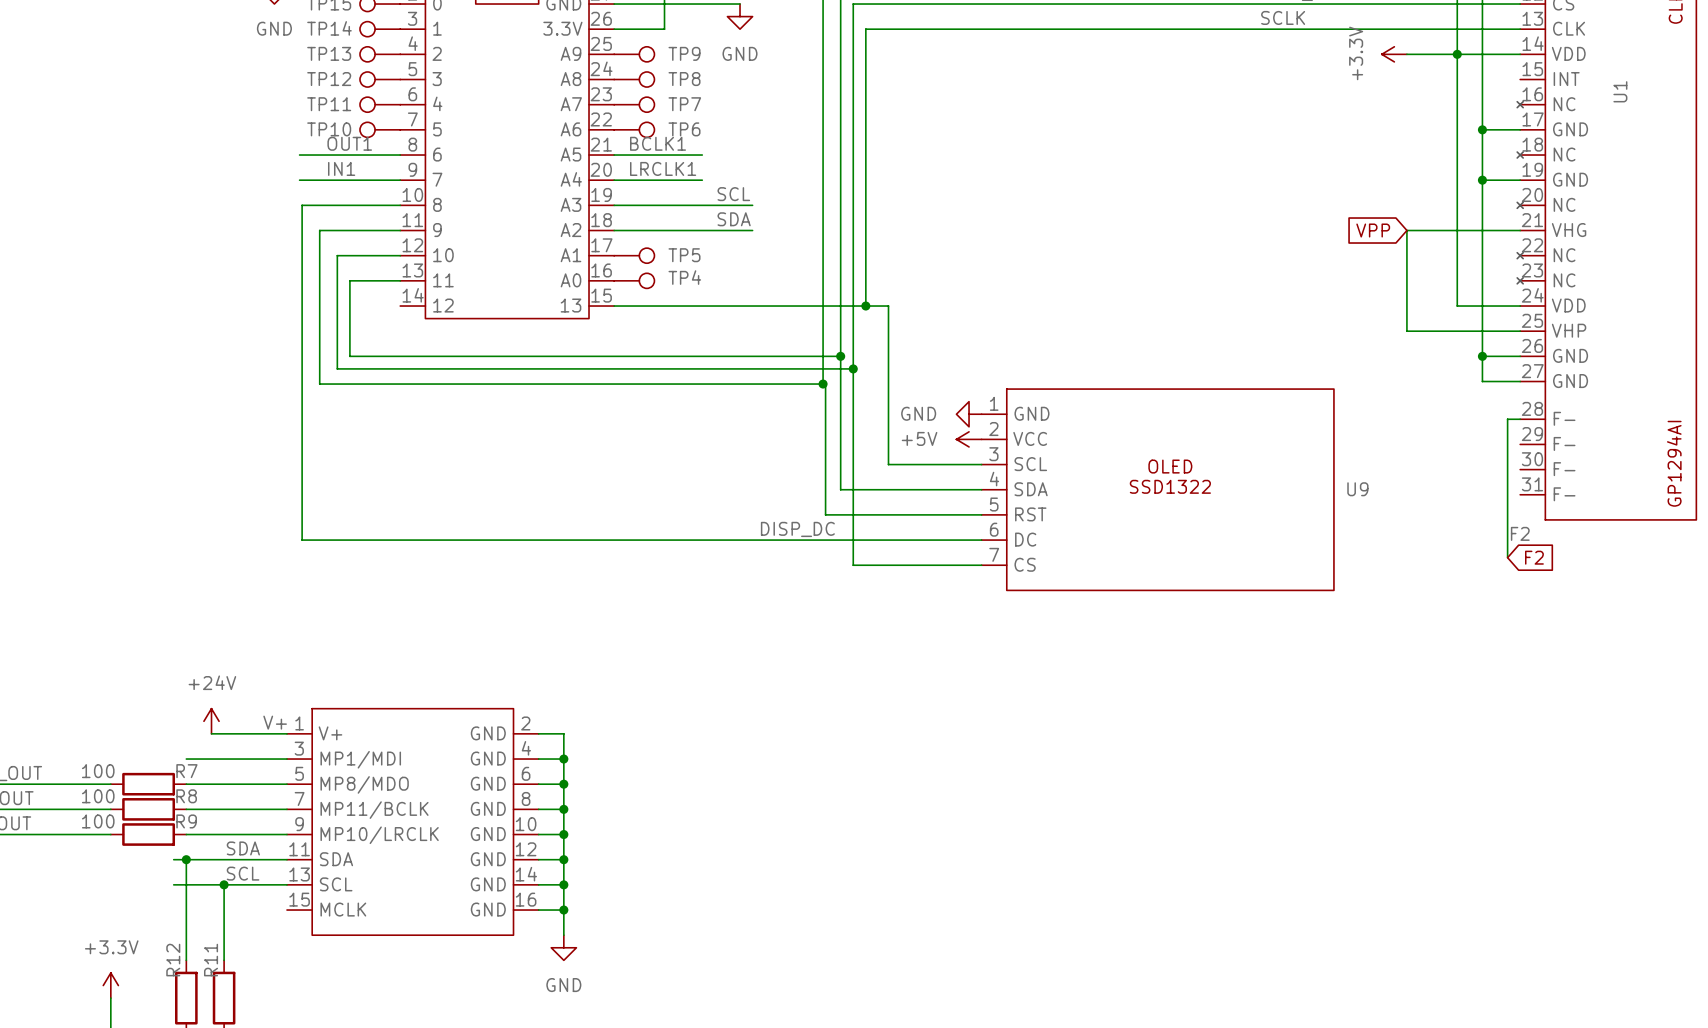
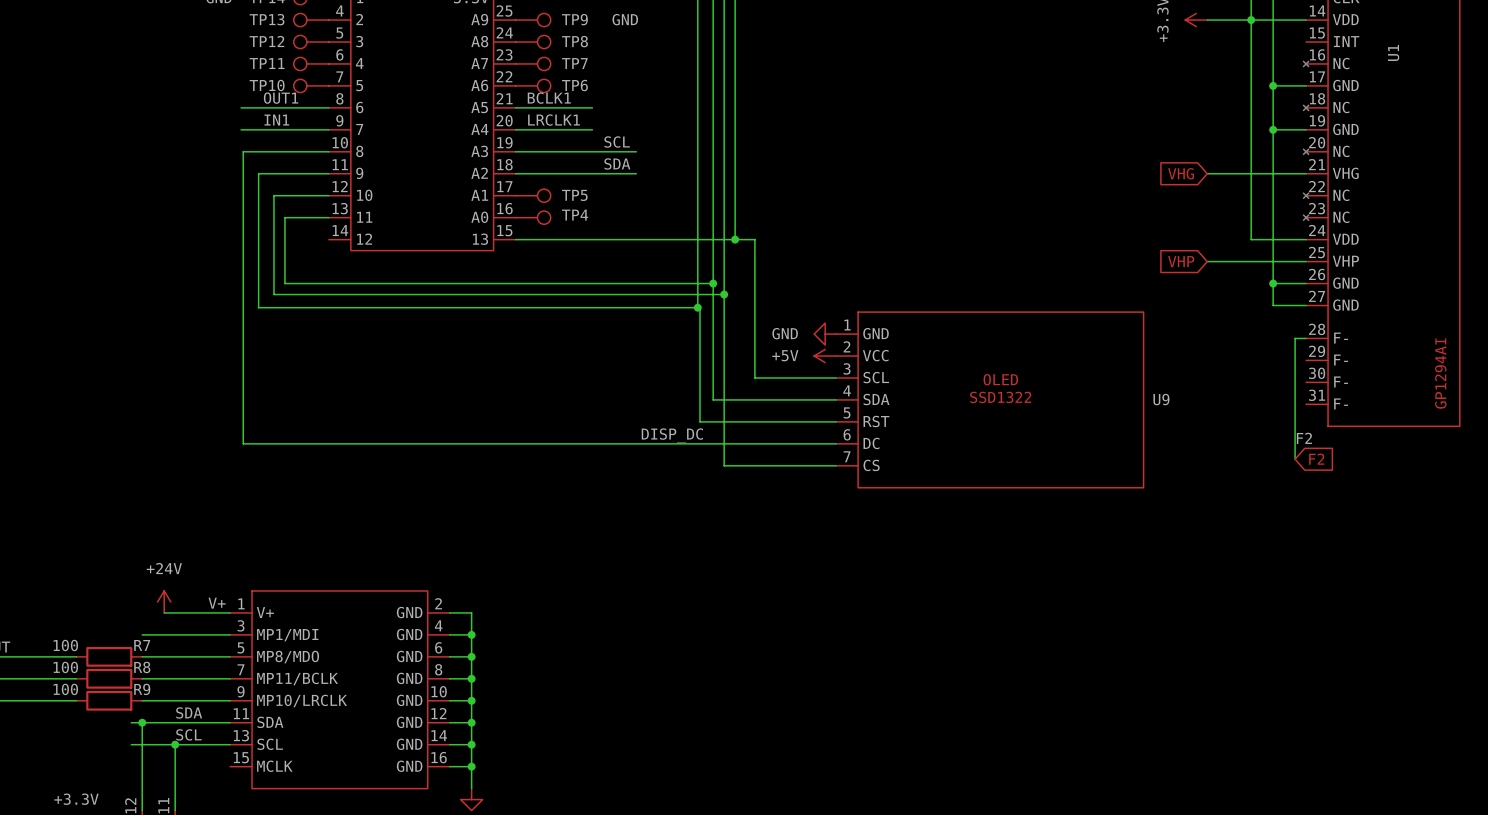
global label: VPP (1373, 230) -> VHG (1181, 173)
wire: (1406, 230) (1406, 331) -> none
global label: none -> VHP (1181, 261)

